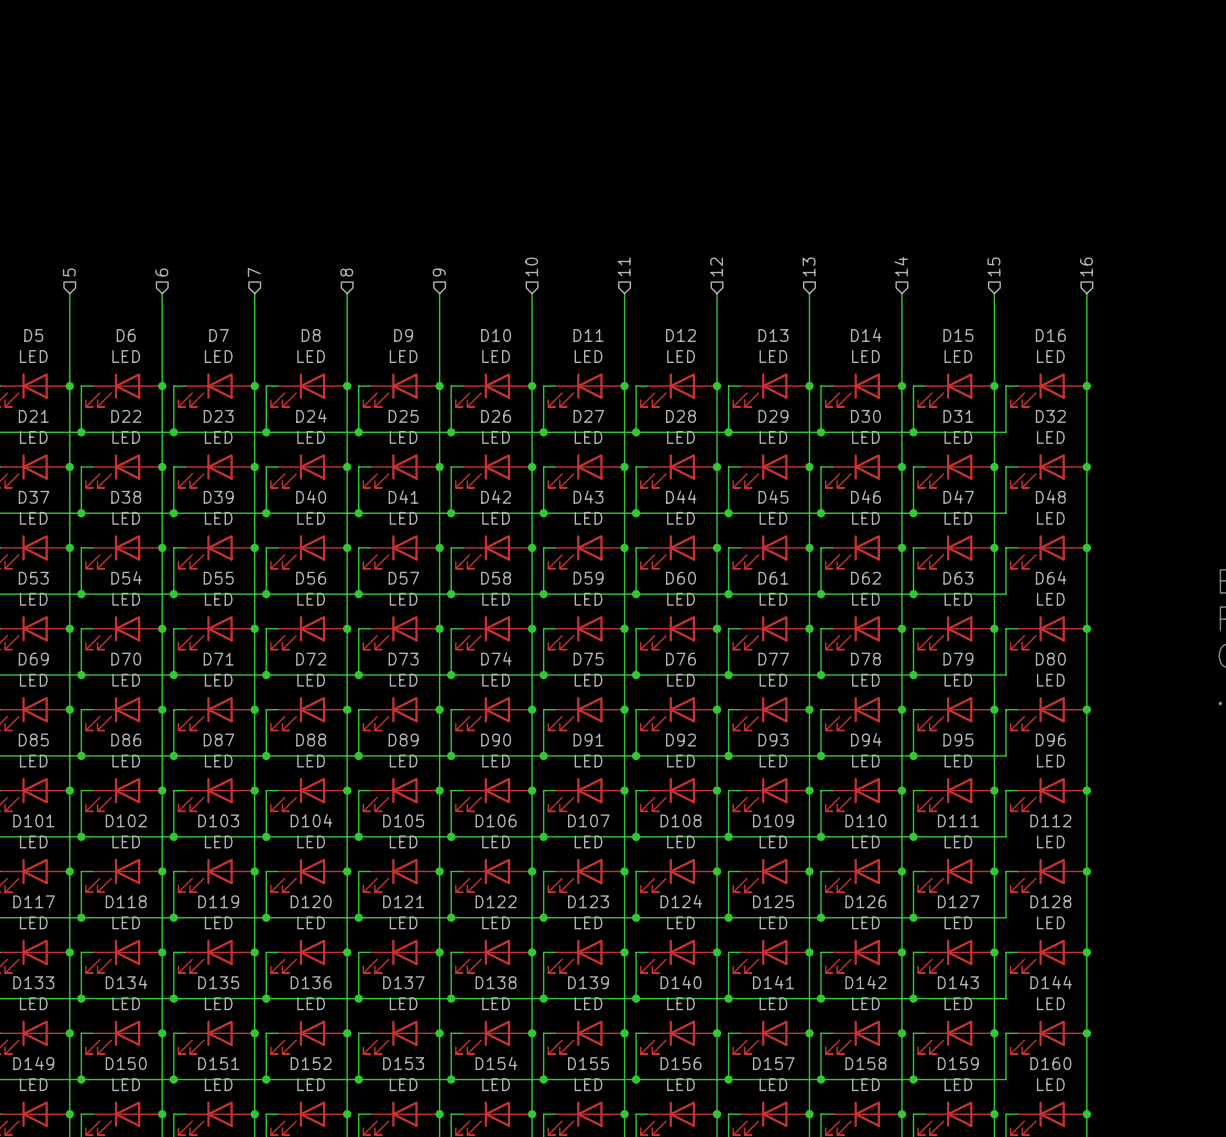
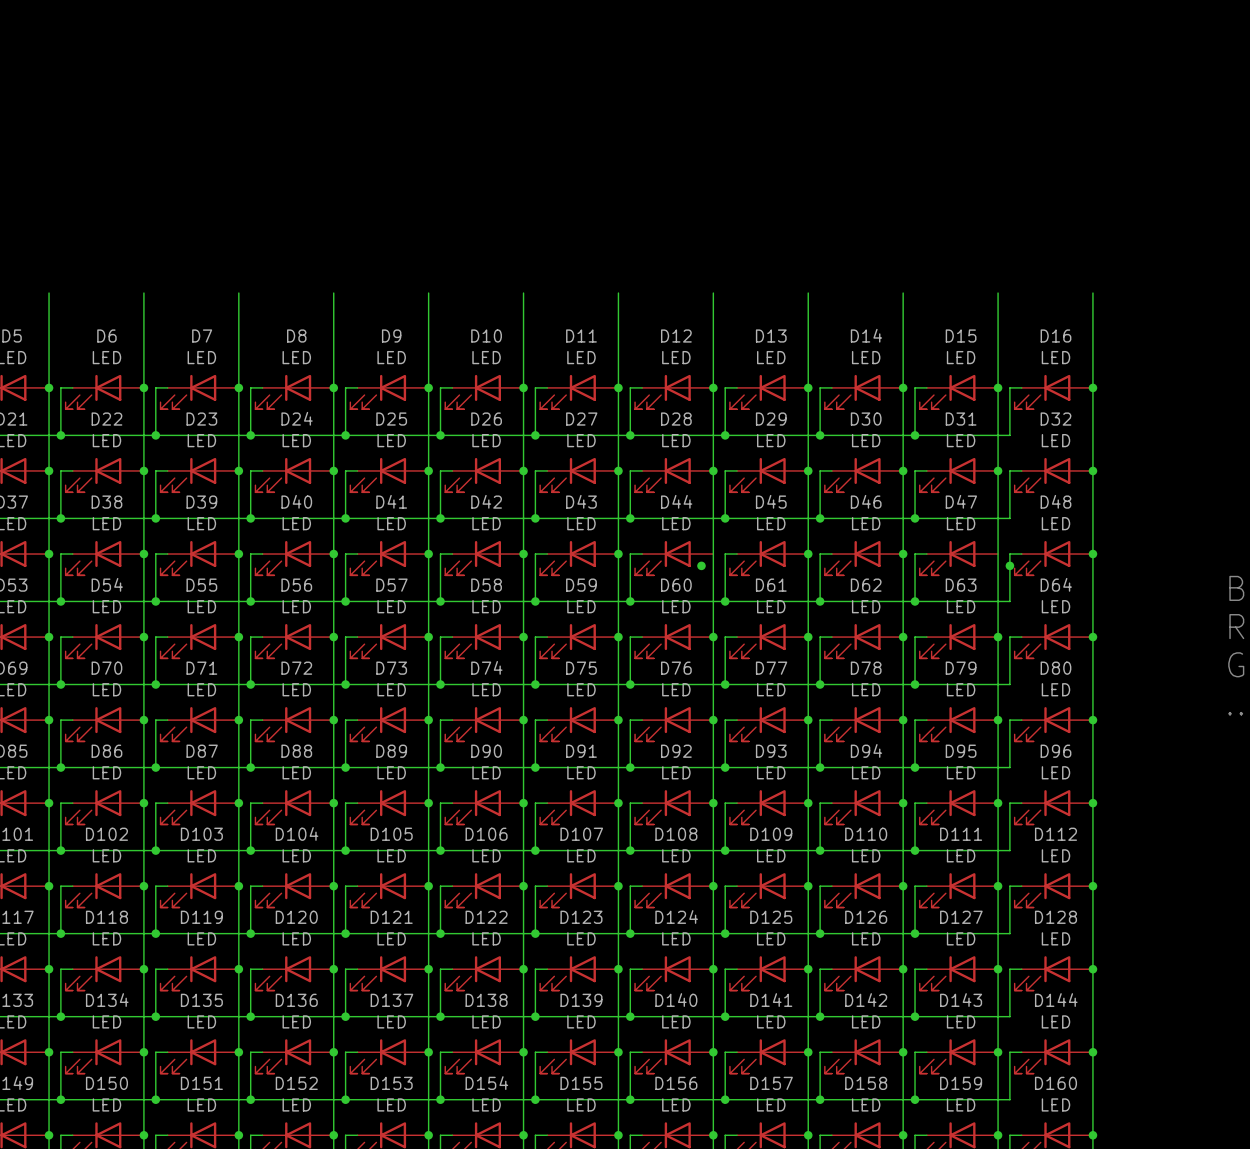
hierarchical label: 14 (901, 266) -> none
hierarchical label: 10 (531, 267) -> none
hierarchical label: 11 (624, 267) -> none
hierarchical label: 12 (716, 267) -> none
hierarchical label: 13 (809, 267) -> none
hierarchical label: 15 (993, 267) -> none
hierarchical label: 16 (1086, 267) -> none
hierarchical label: 5 (69, 272) -> none
hierarchical label: 6 (161, 272) -> none
hierarchical label: 7 (254, 272) -> none
hierarchical label: 8 (346, 272) -> none
hierarchical label: 9 (439, 272) -> none
junction position: (717, 547) -> (701, 565)
junction position: (994, 547) -> (1009, 565)

